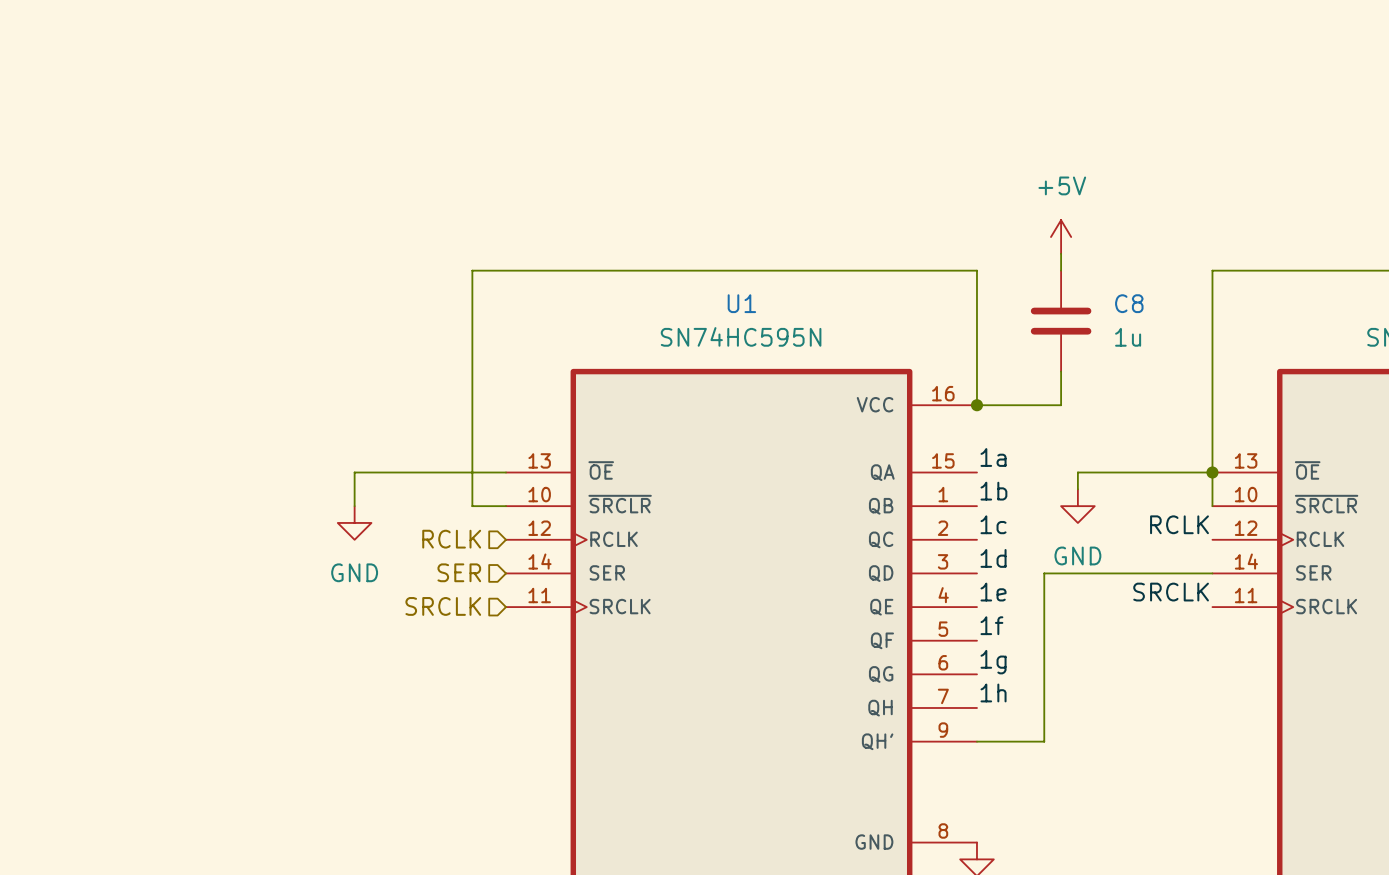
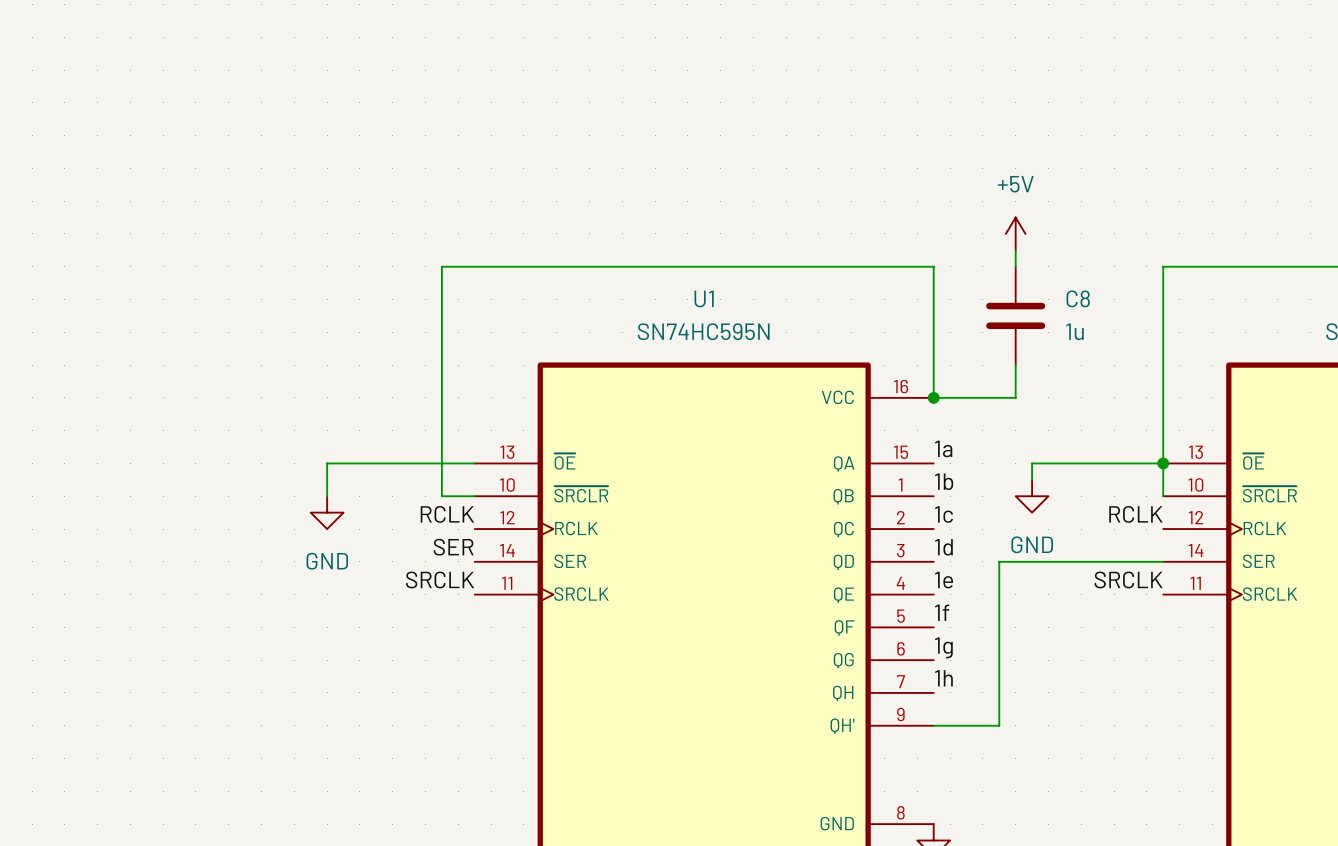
label: none -> RCLK (447, 514)
hierarchical label: RCLK (451, 539) -> none
label: none -> SER (453, 547)
hierarchical label: SER (459, 572) -> none
label: none -> SRCLK (440, 579)
hierarchical label: SRCLK (443, 606) -> none

